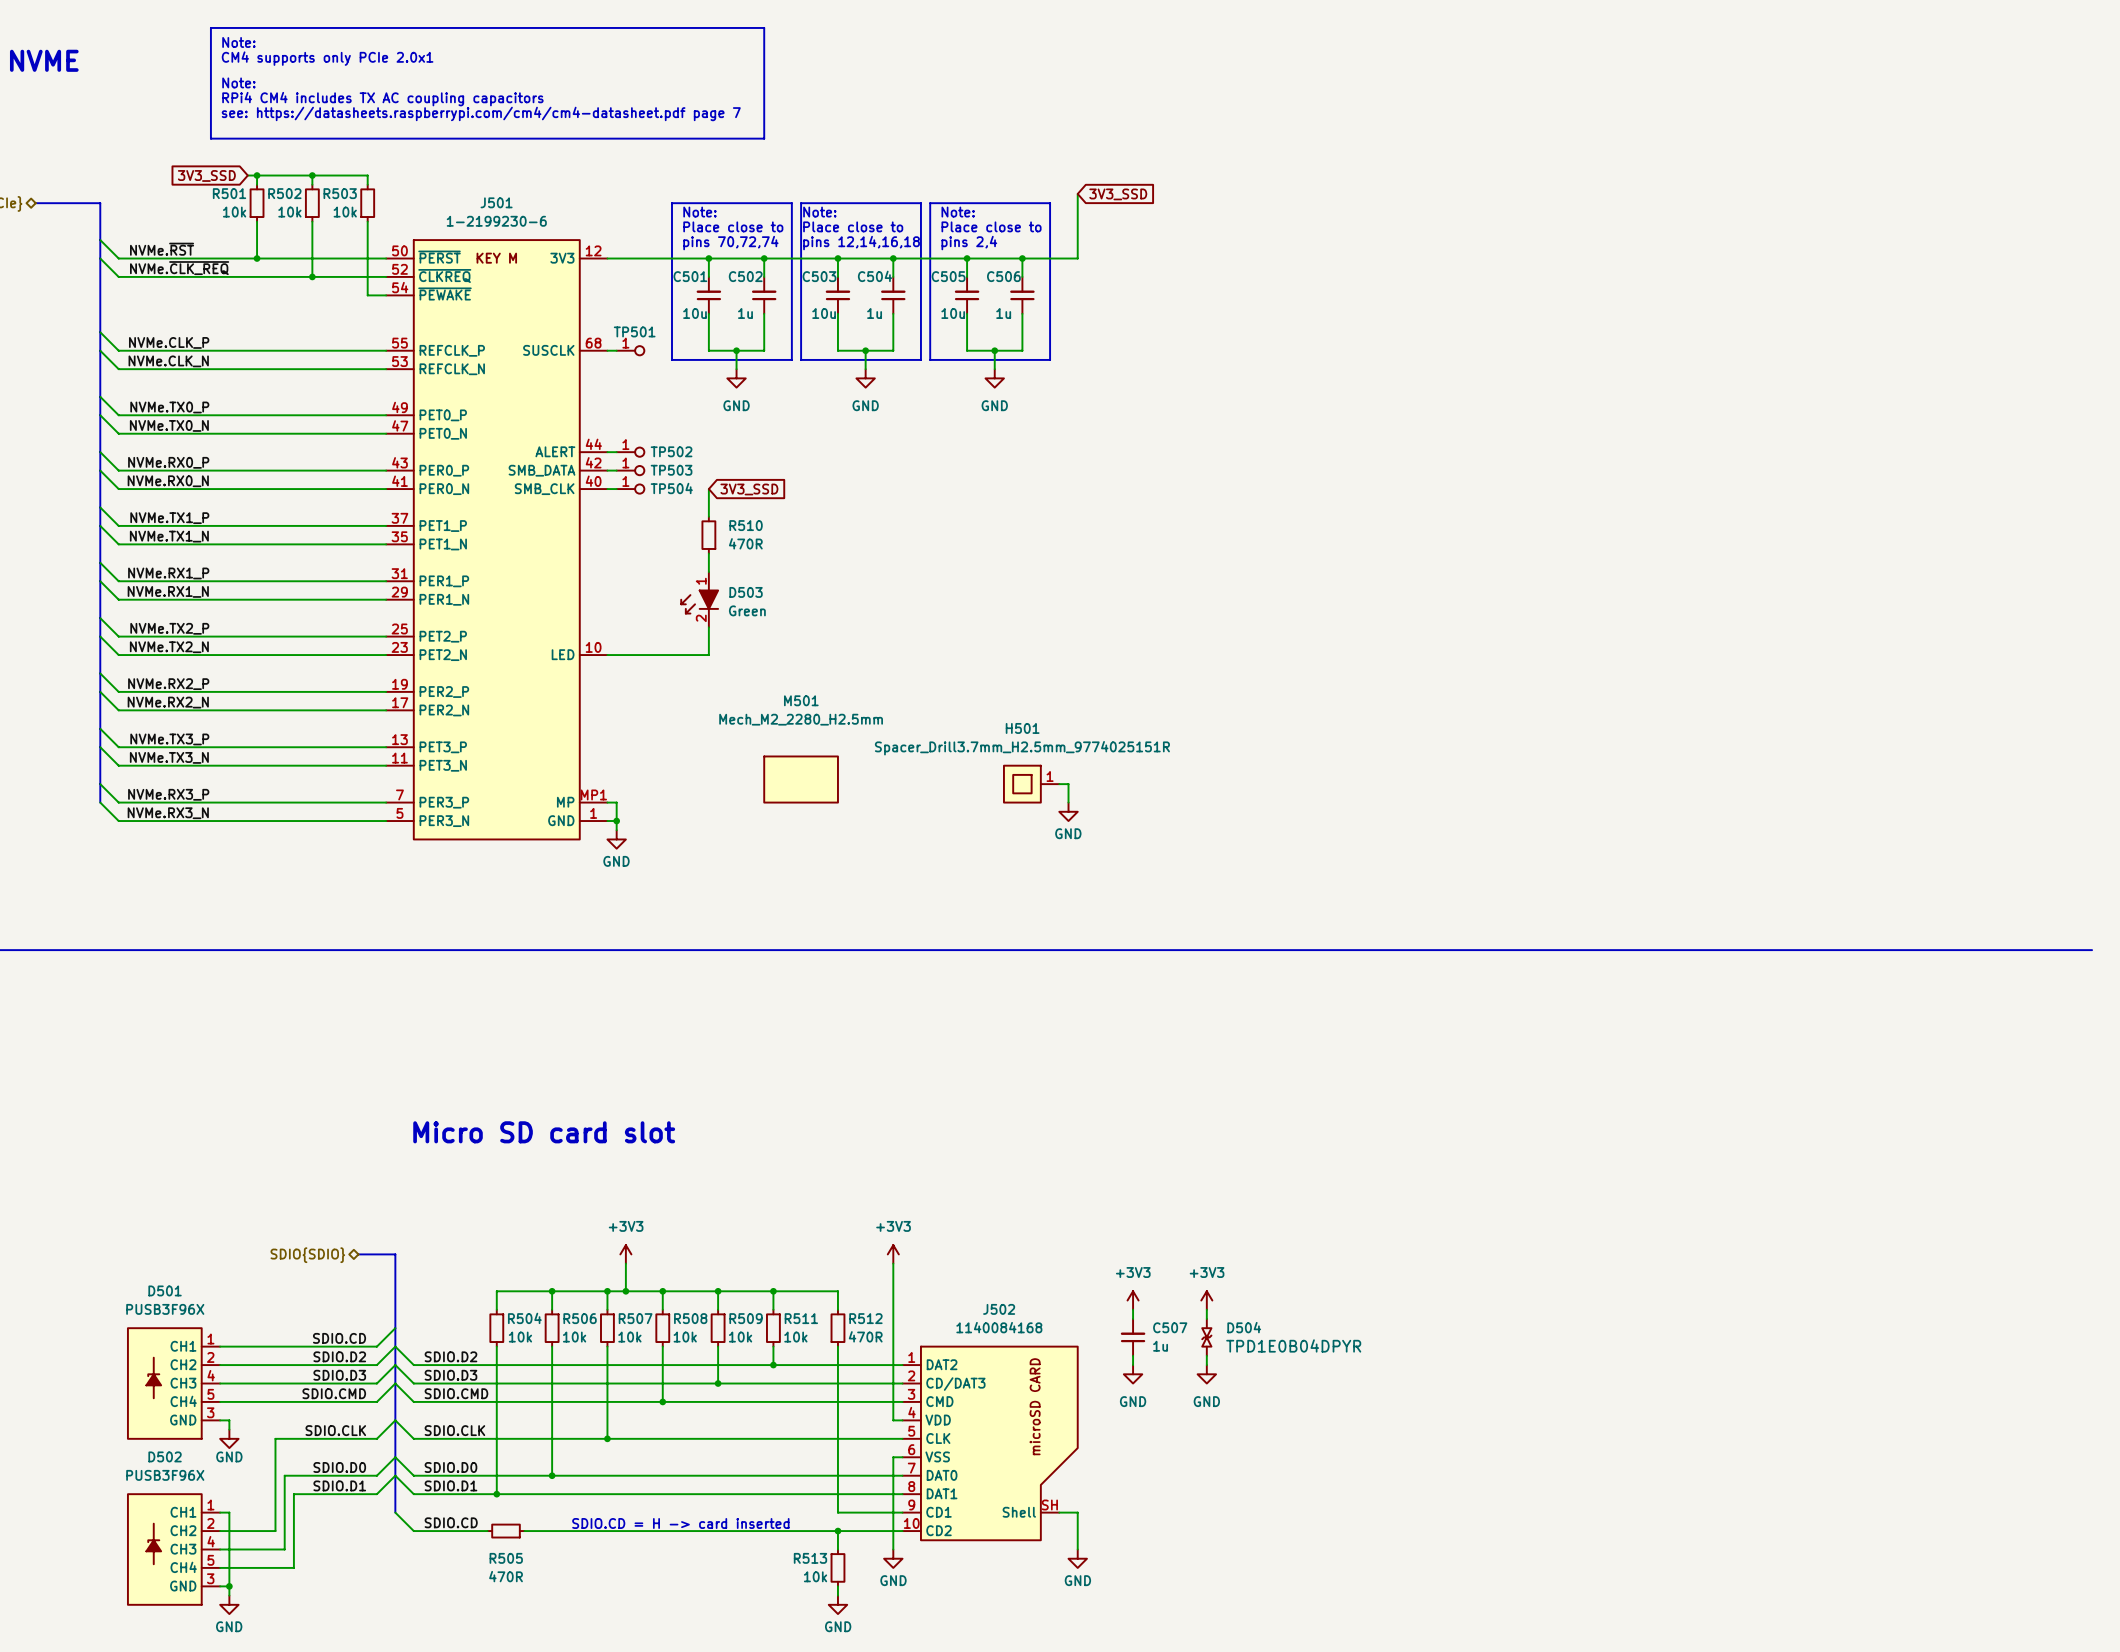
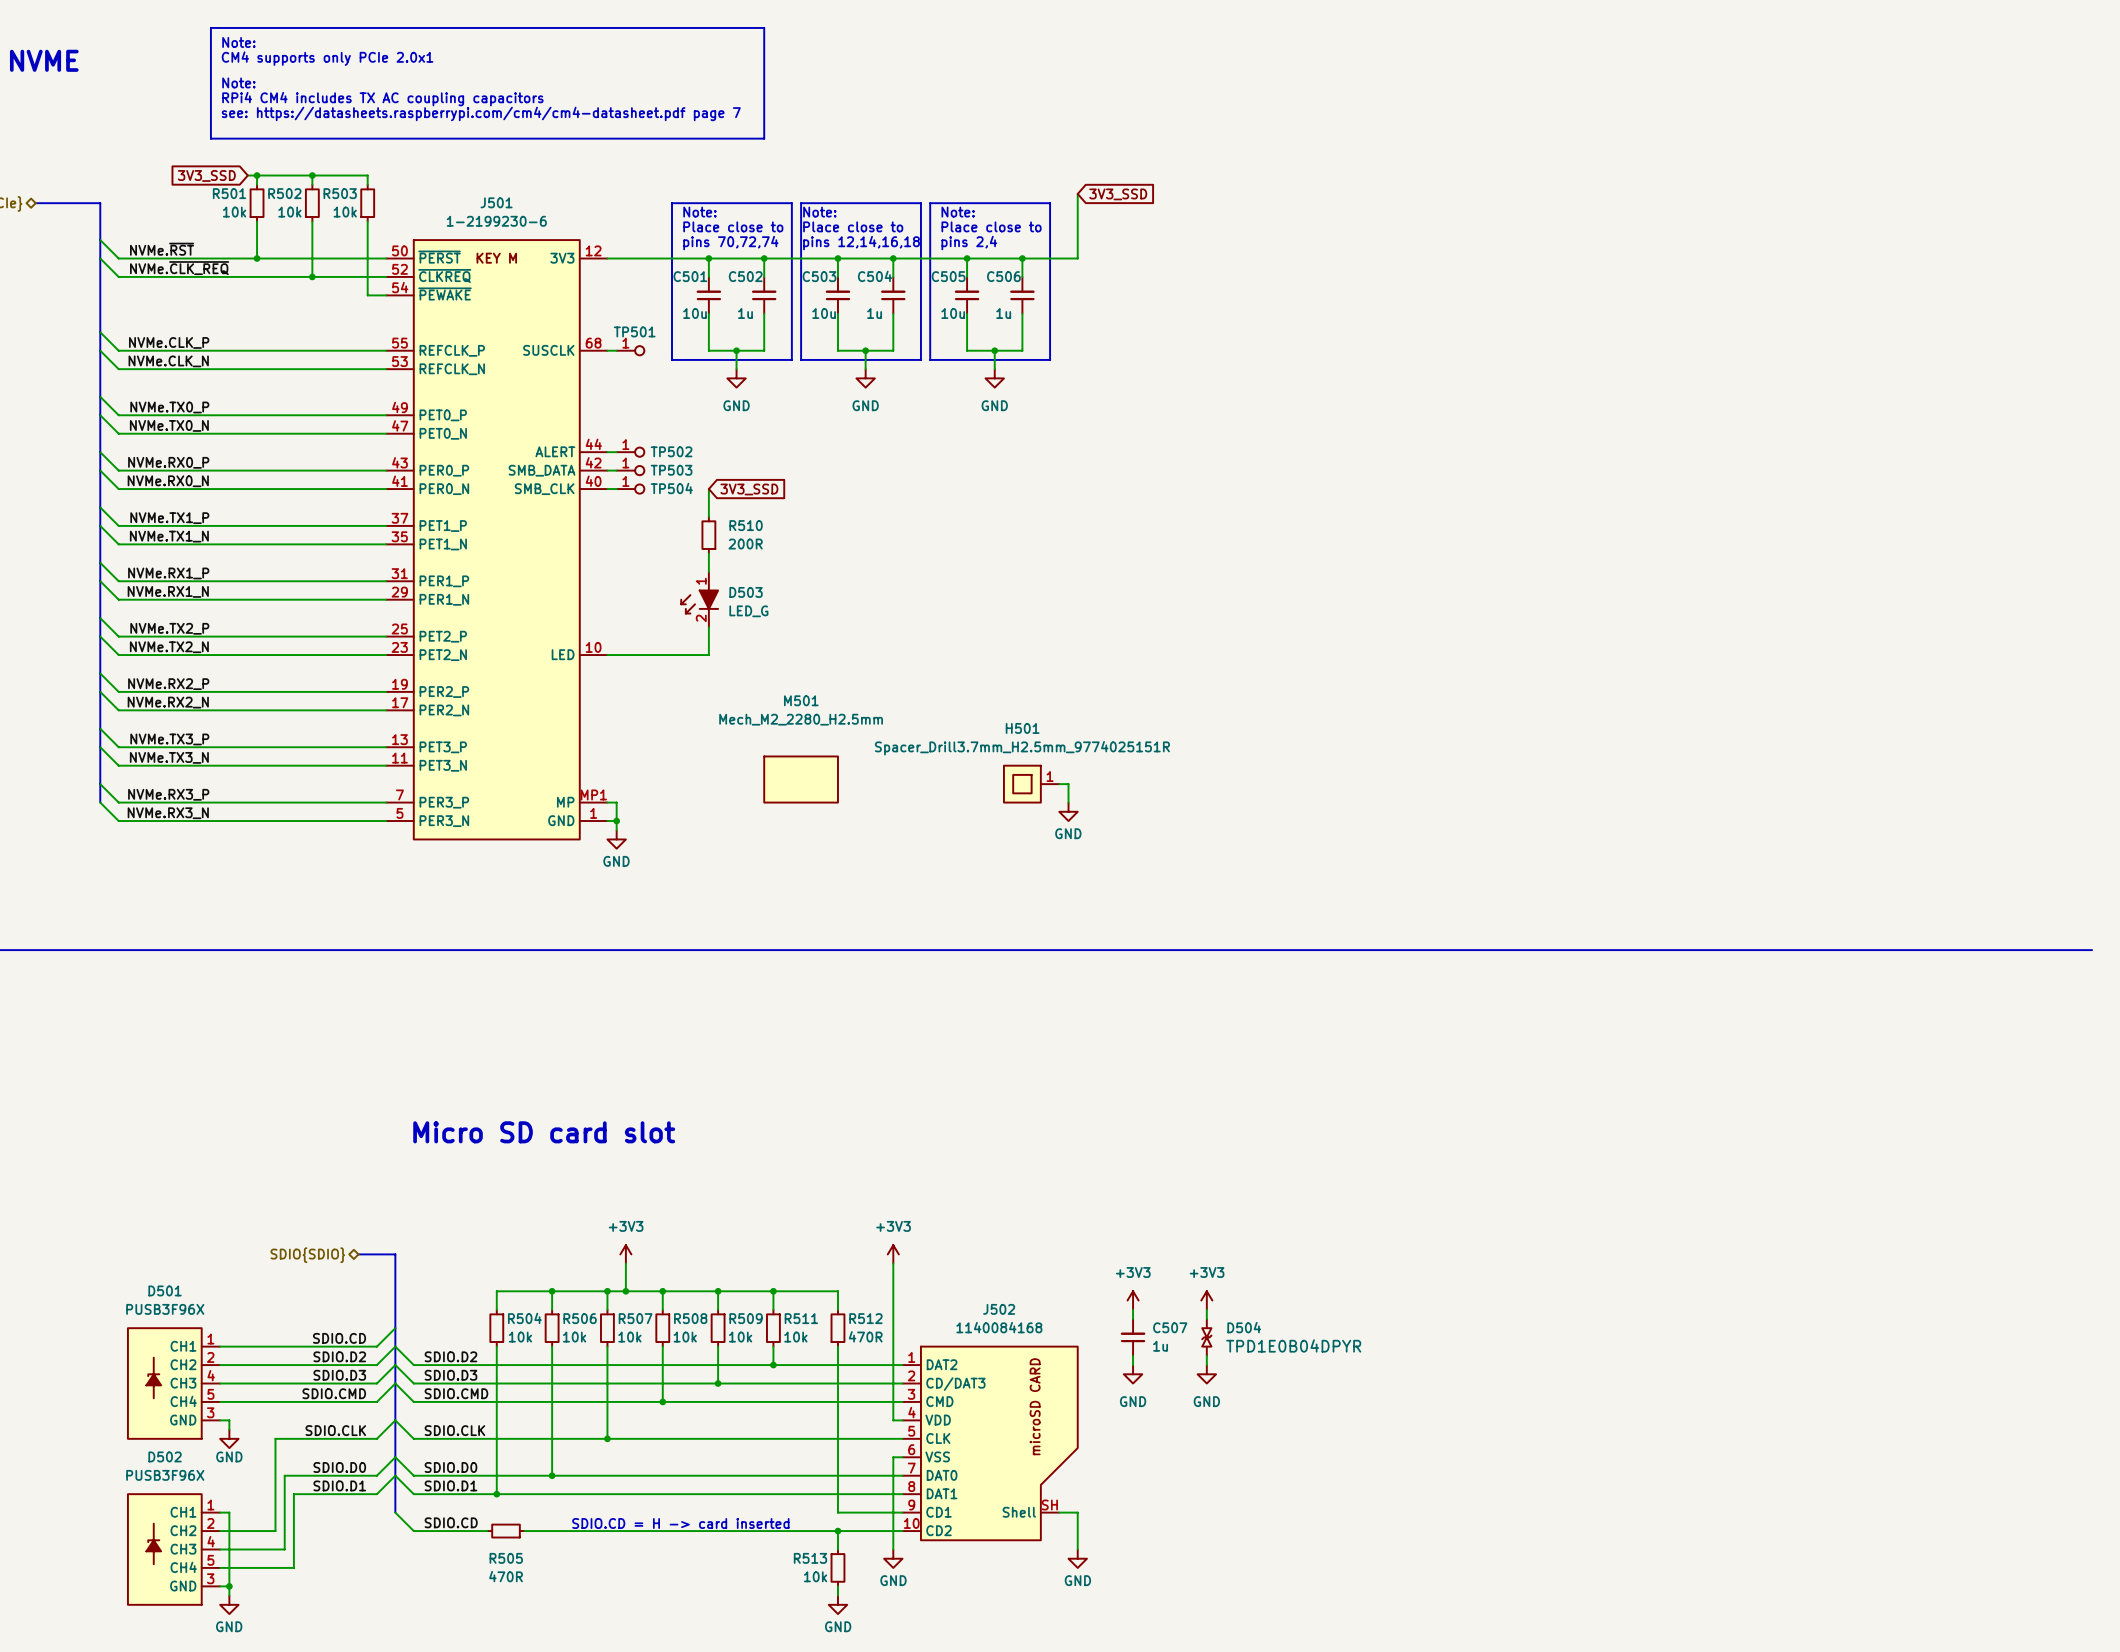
R510 text: 470R (745, 543) -> 200R (745, 544)
D503 text: Green (747, 610) -> none
D503 value: none -> LED_G (748, 611)

